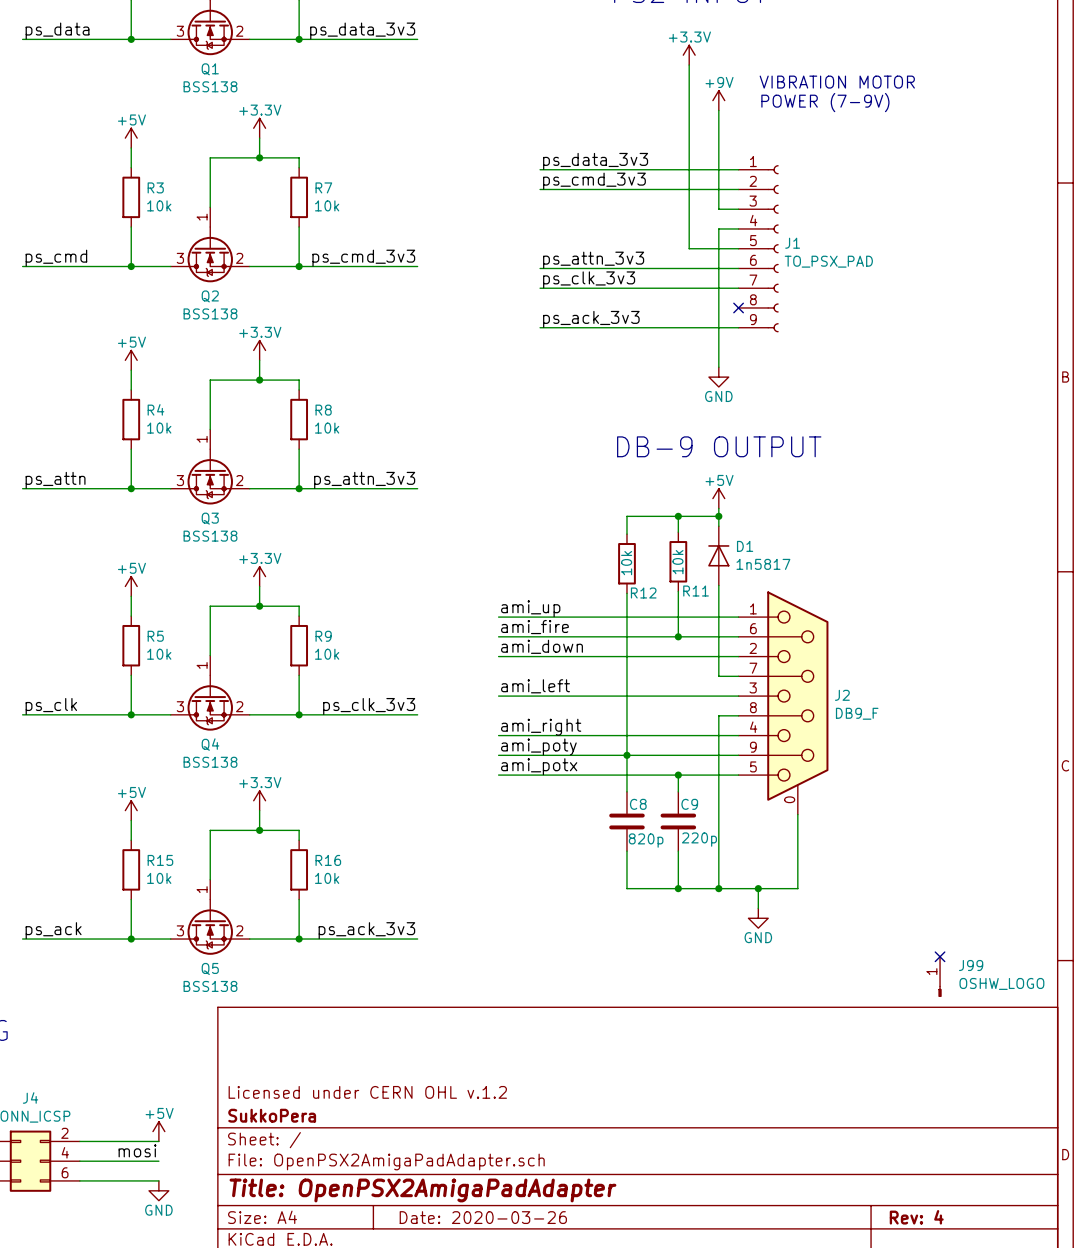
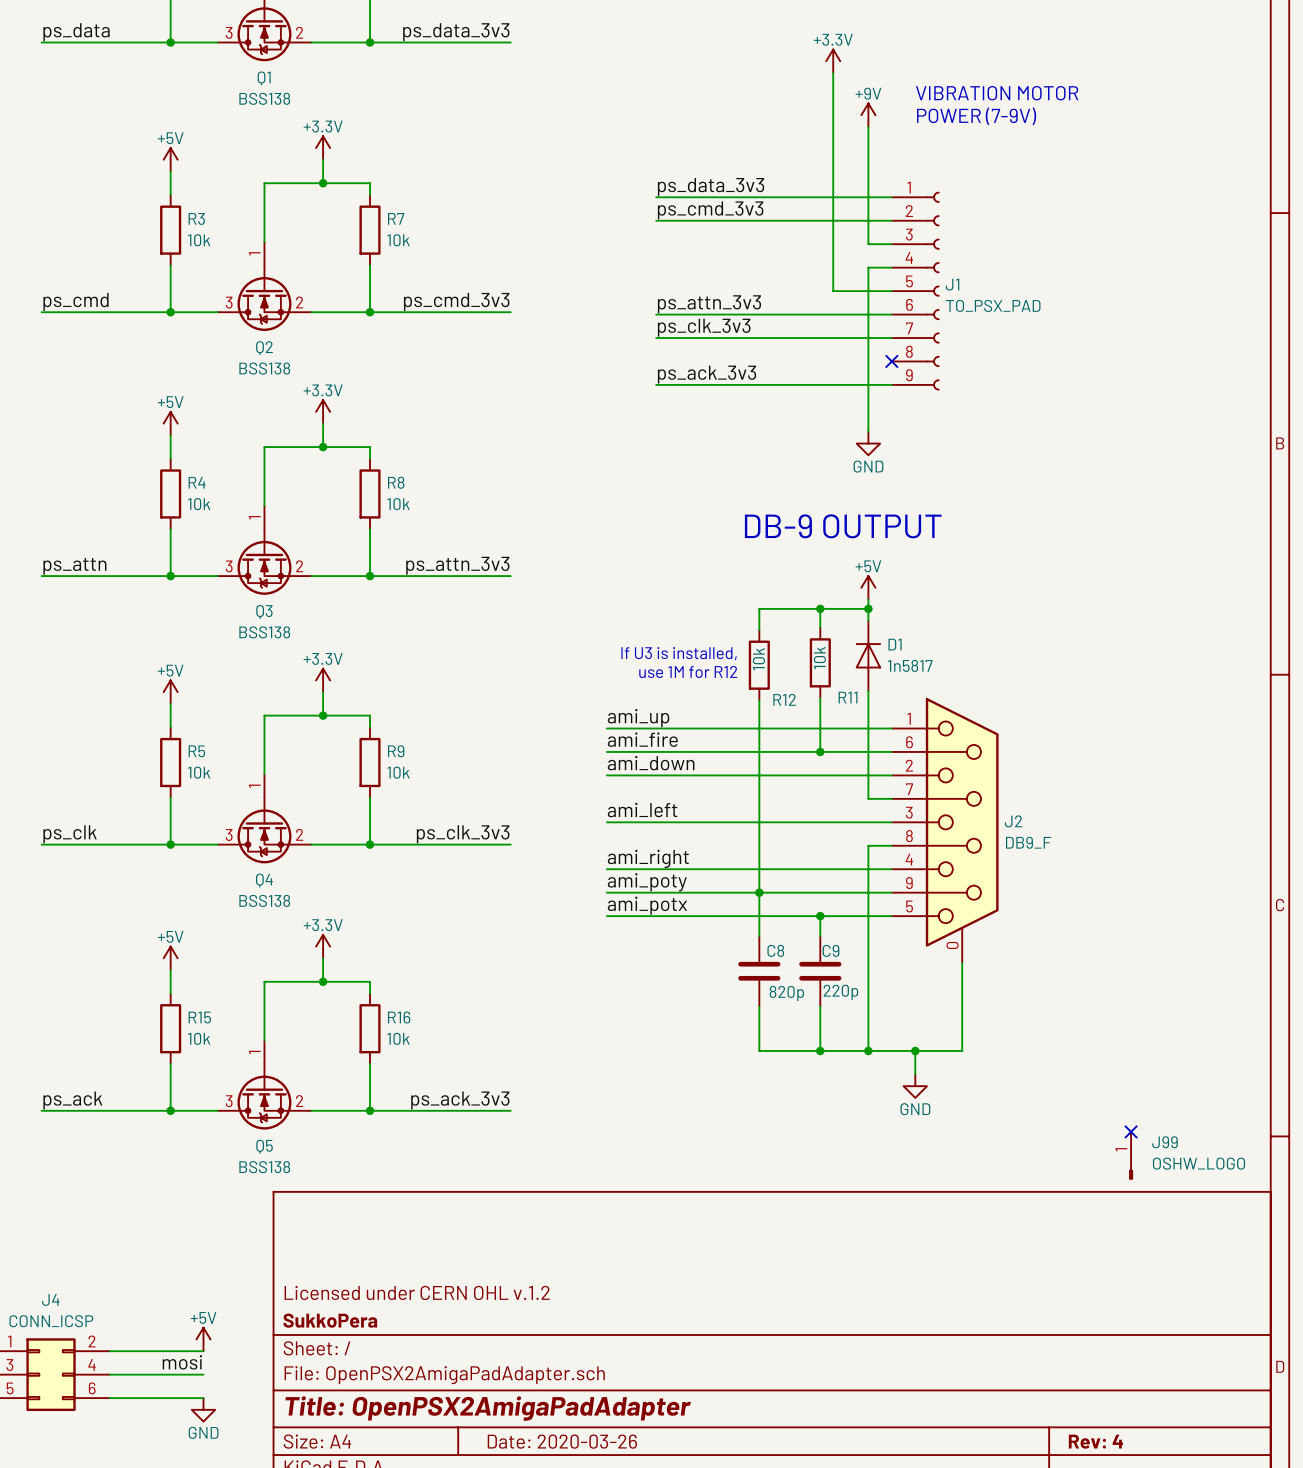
text: none -> If U3 is installed, (679, 653)
text: none -> use 1M for R12 (688, 672)

